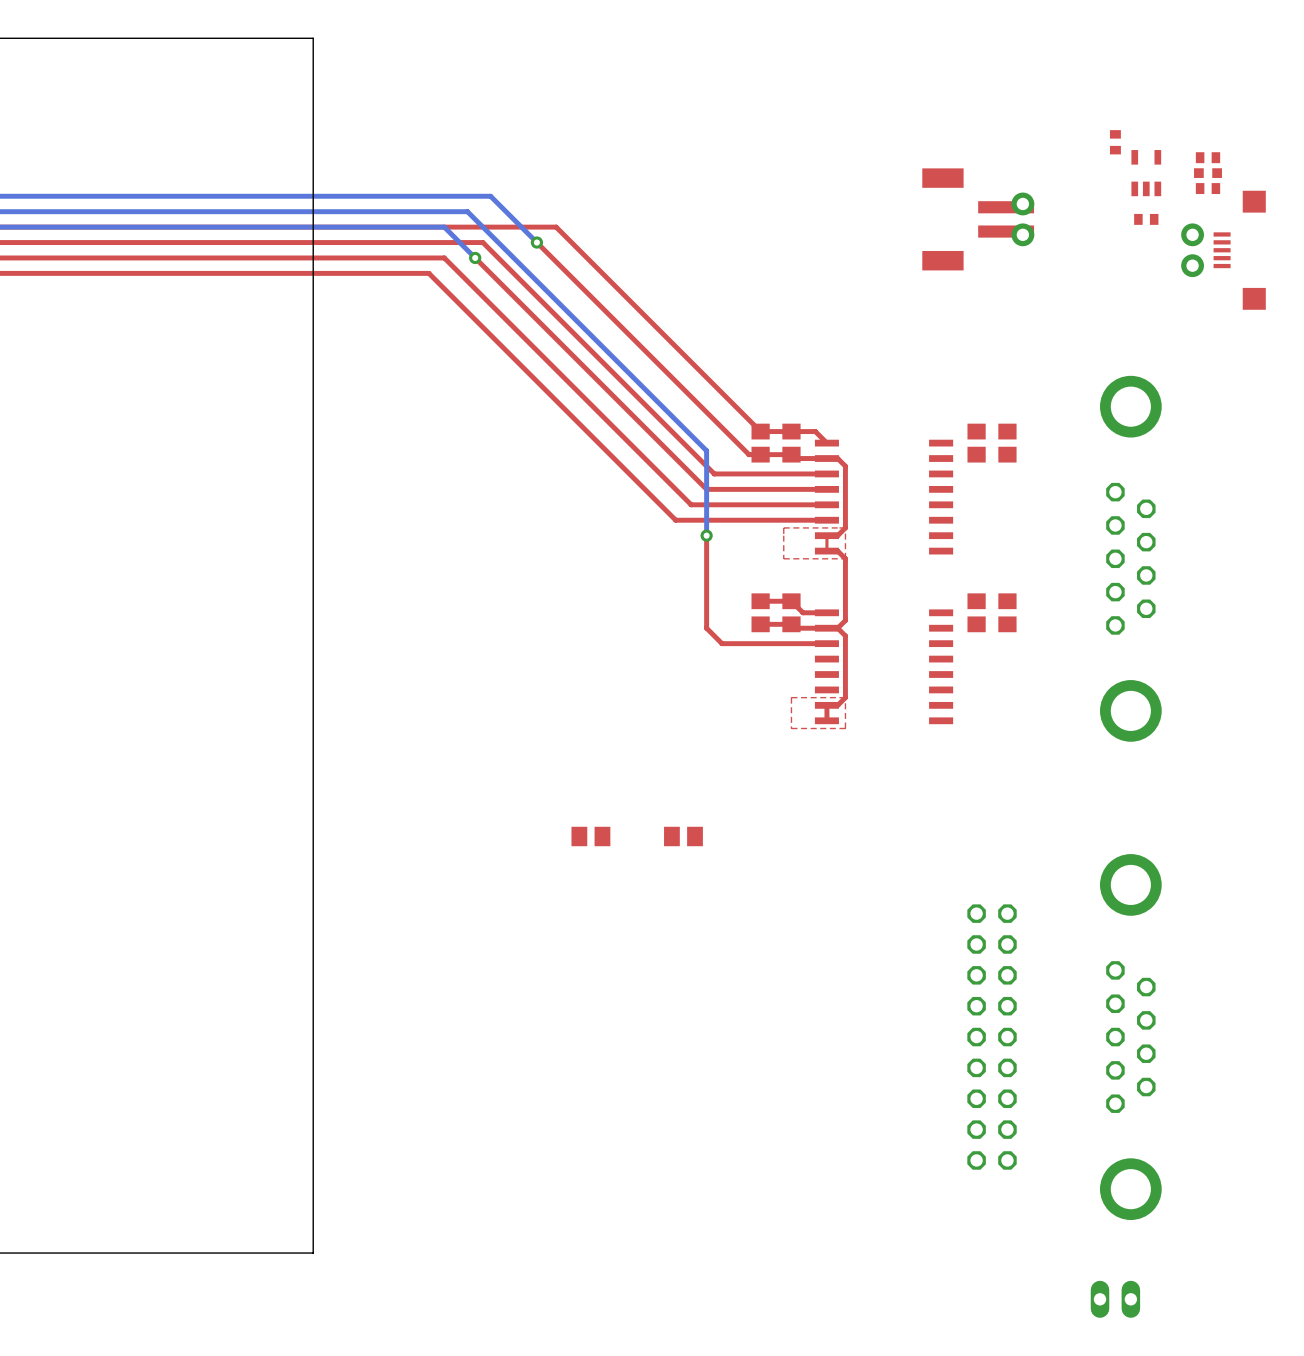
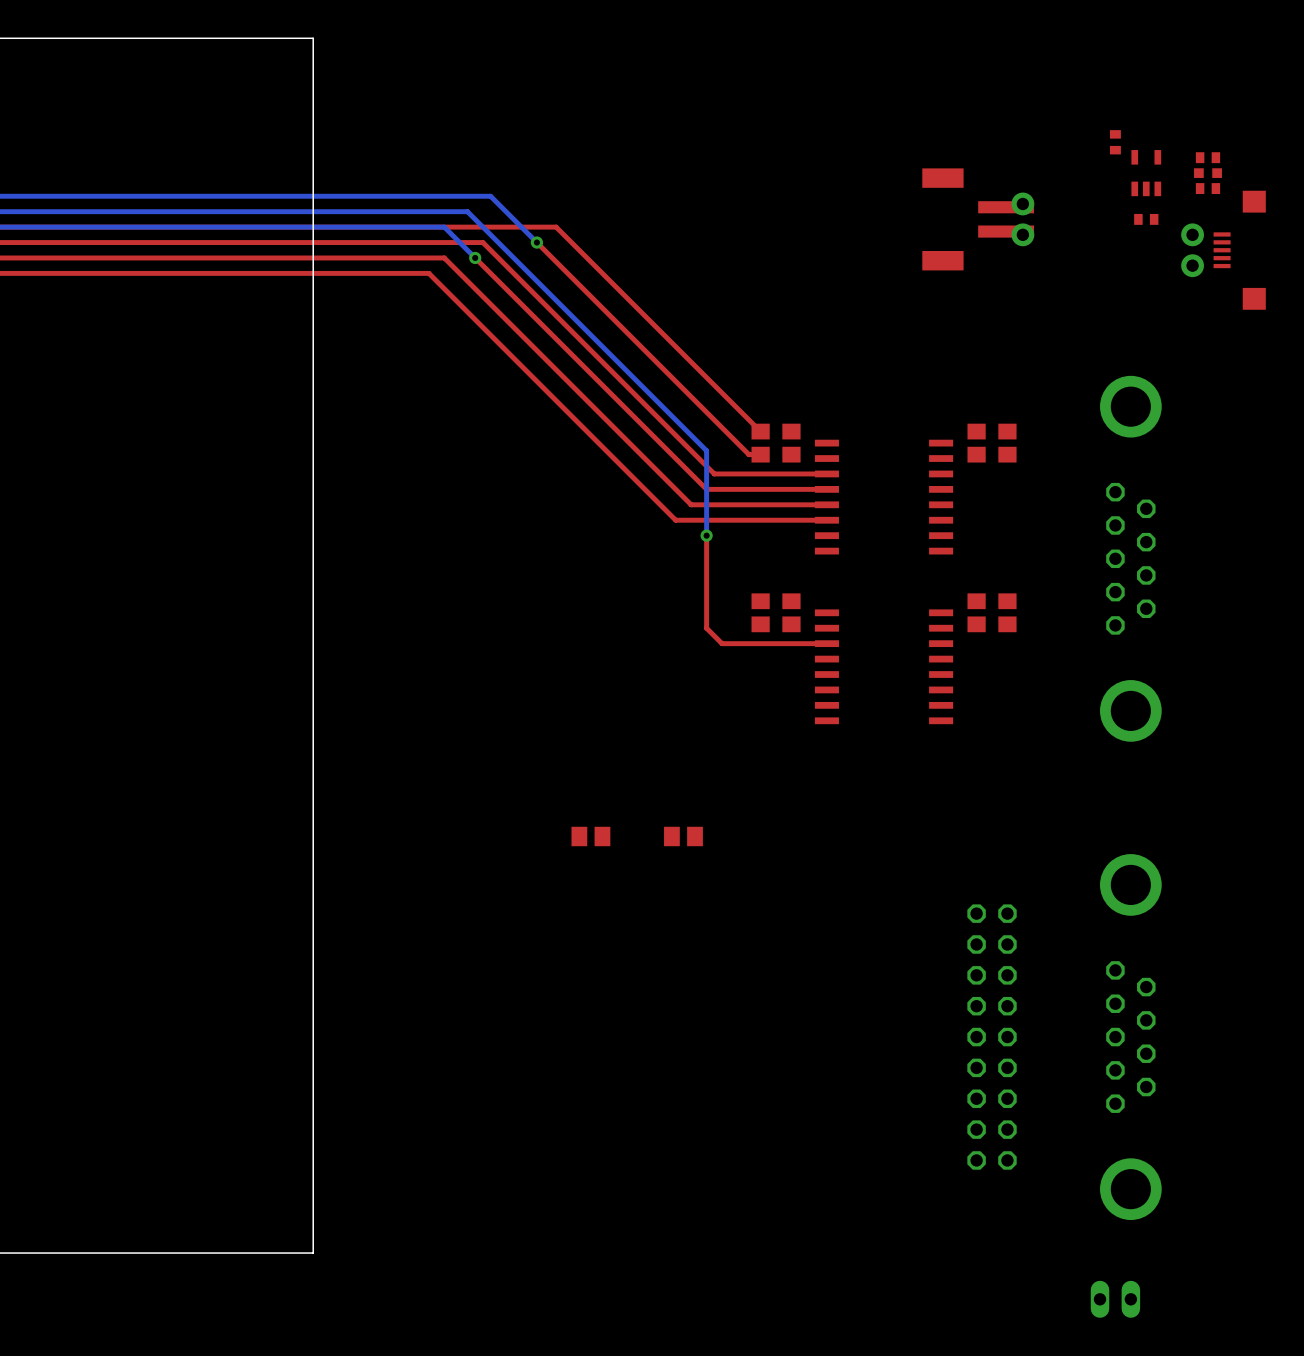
top track: (760, 431) (815, 431) (826, 443) -> none
top track: (760, 454) (791, 454) (795, 458) (826, 458) -> none
top track: (826, 458) (837, 458) (845, 466) (845, 527) (837, 535) (826, 535) (826, 551) (837, 551) (845, 558) (845, 620) (837, 628) (795, 628) (791, 624) (760, 624) -> none
top zone outline: (845, 527) (783, 527) (783, 558) (845, 558) (845, 527) -> none
top track: (760, 601) (791, 601) (803, 612) (826, 612) -> none
top track: (826, 628) (837, 628) (845, 635) (845, 697) (837, 705) (826, 705) (826, 720) -> none
top zone outline: (845, 697) (845, 728) (791, 728) (791, 697) (845, 697) -> none

